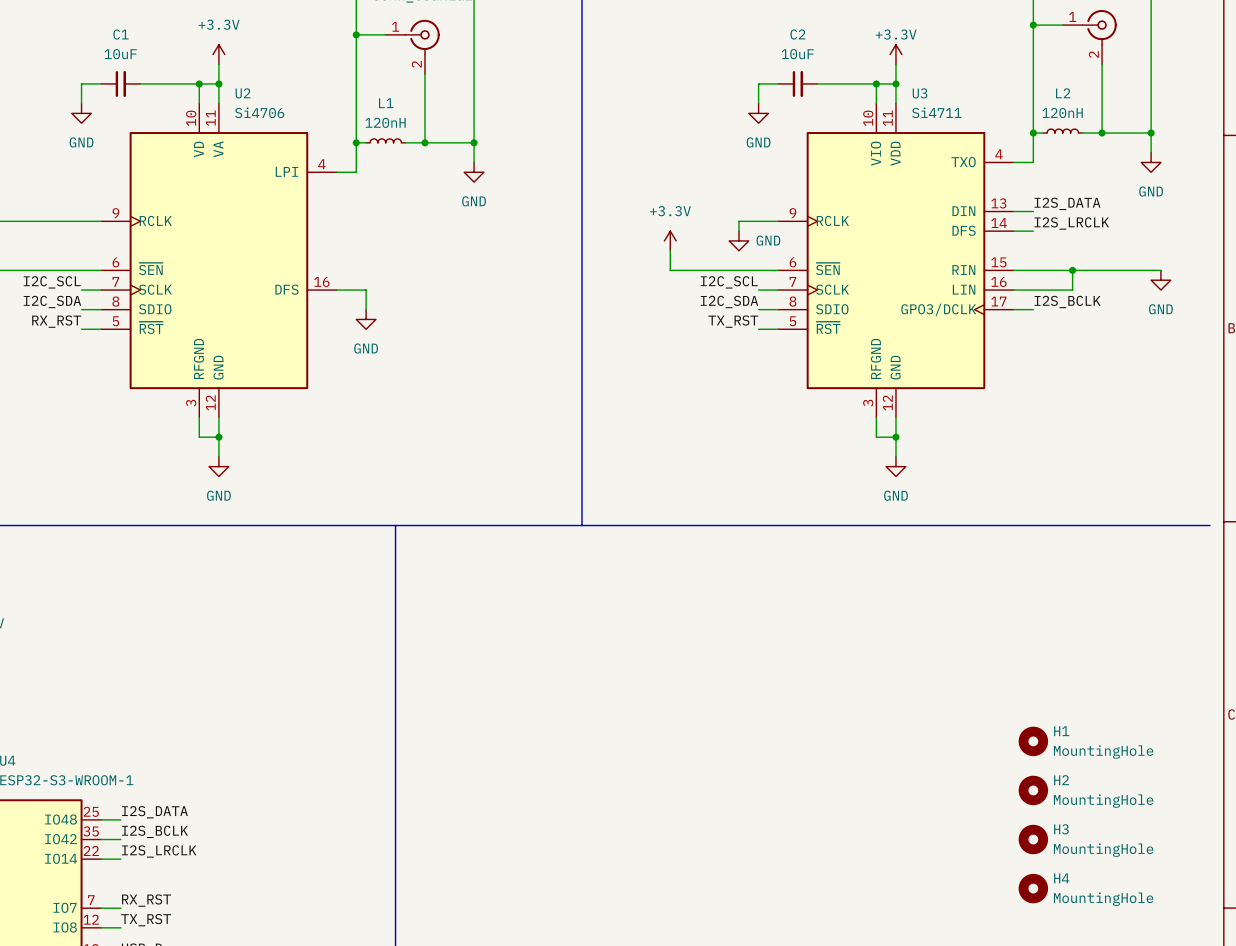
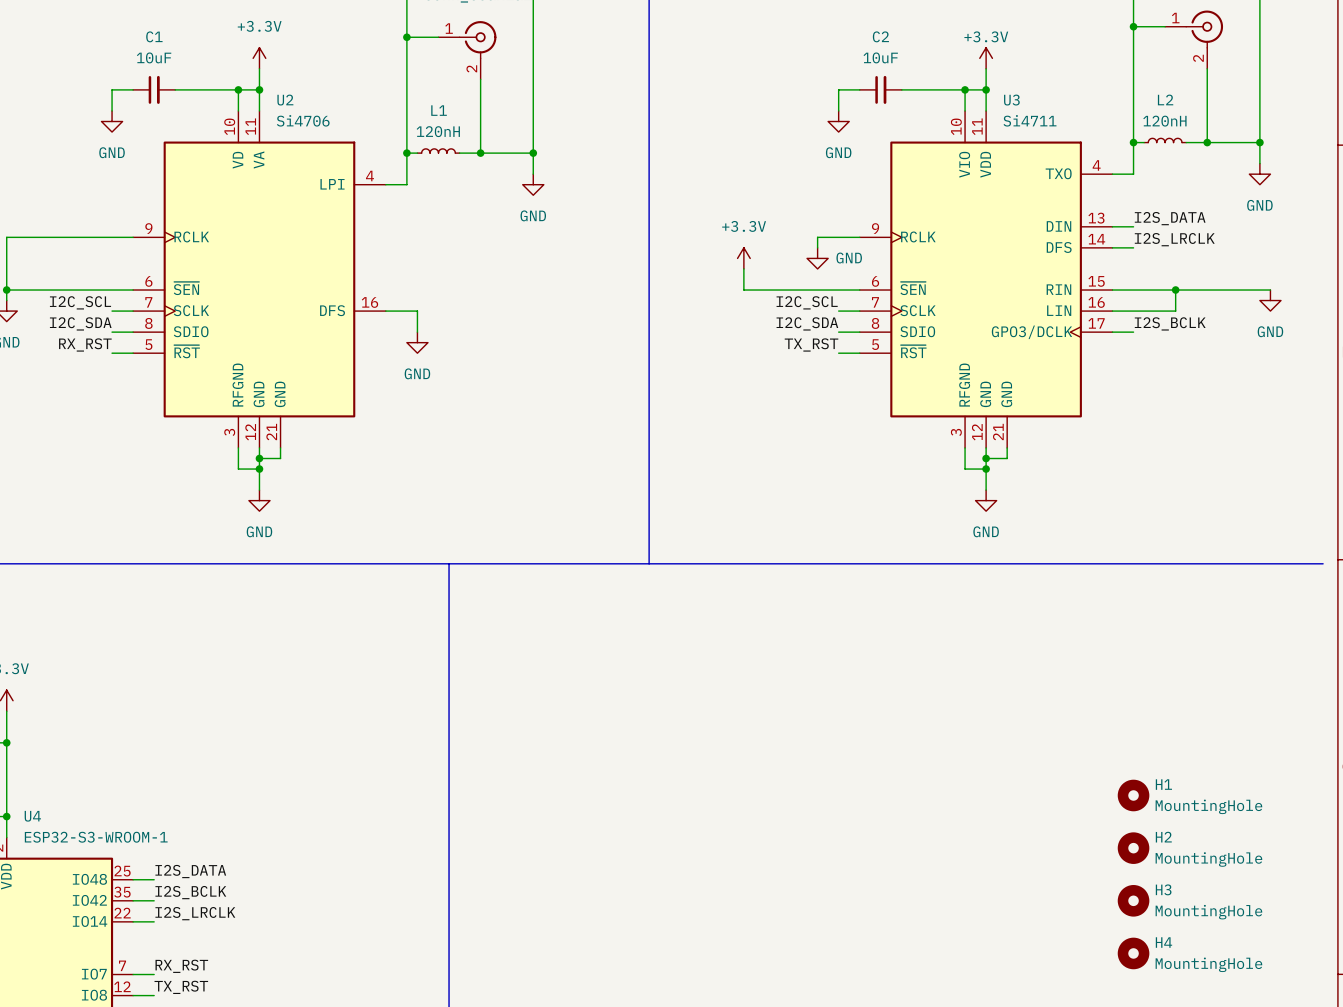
U2 symbol: [101, 103, 337, 418] -> [133, 110, 386, 448]
U3 symbol: [778, 103, 1014, 418] -> [859, 110, 1113, 448]
wire: none -> (280, 447) (280, 458) (259, 458)
wire: none -> (1007, 447) (1007, 458) (986, 458)
junction: none -> (259, 458)
junction: none -> (986, 458)

